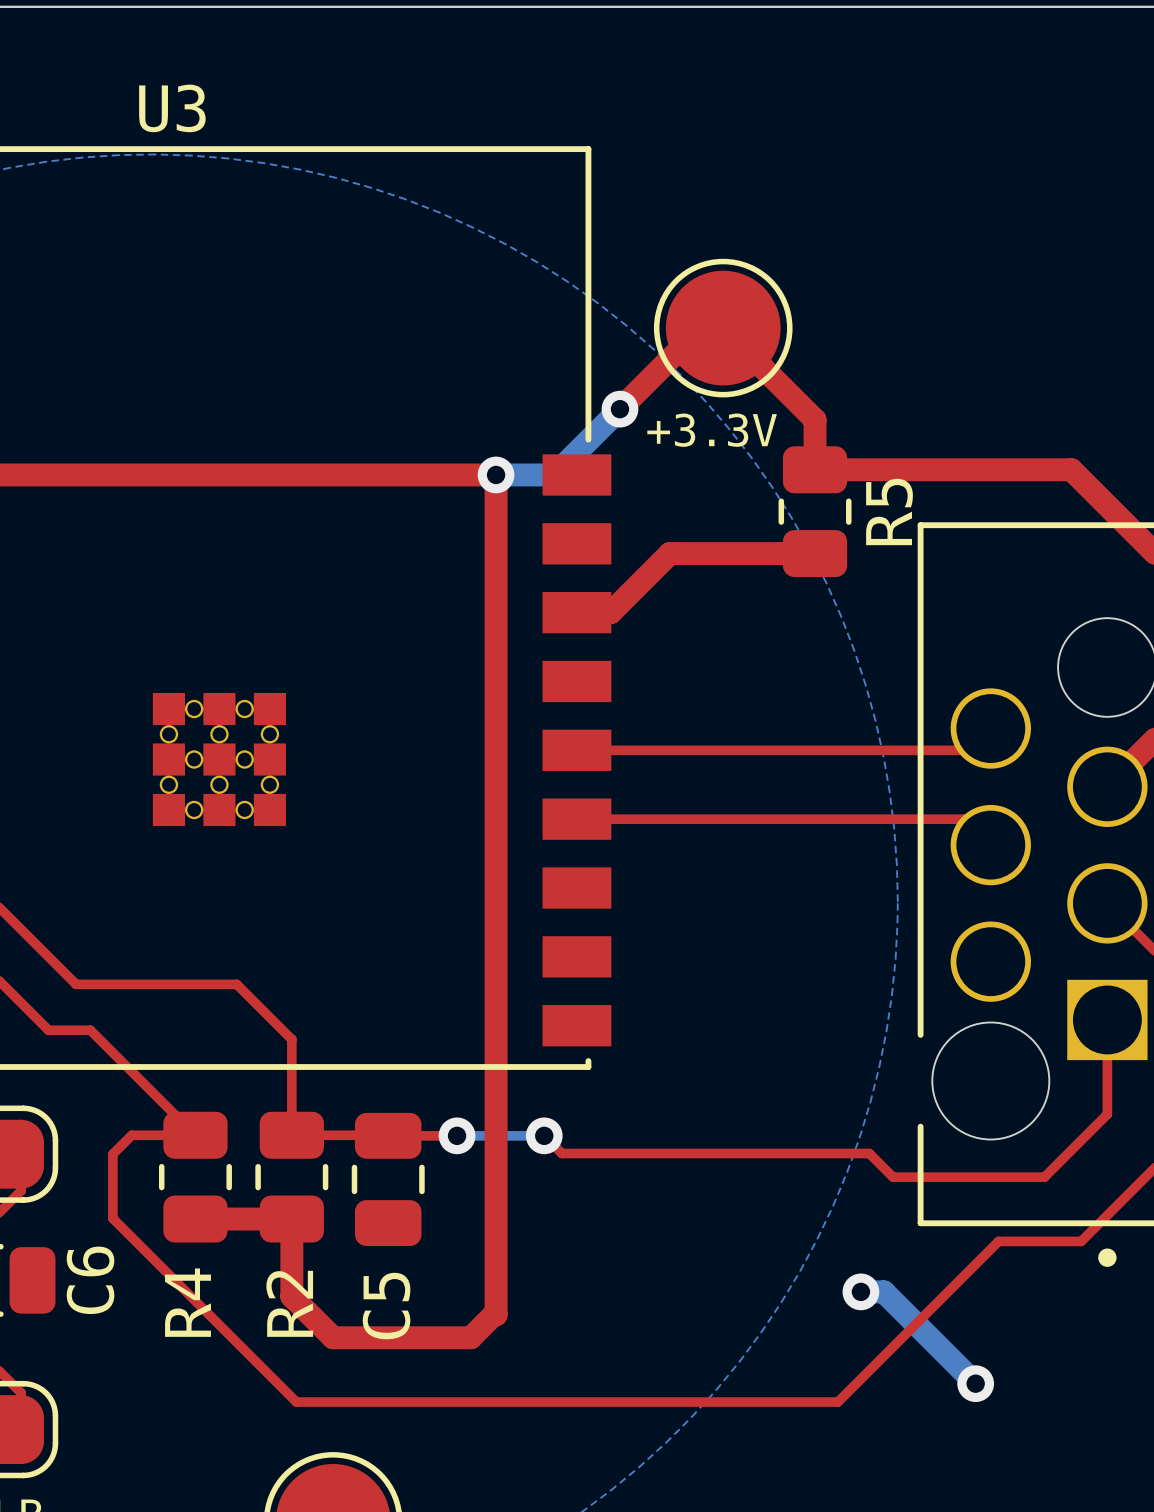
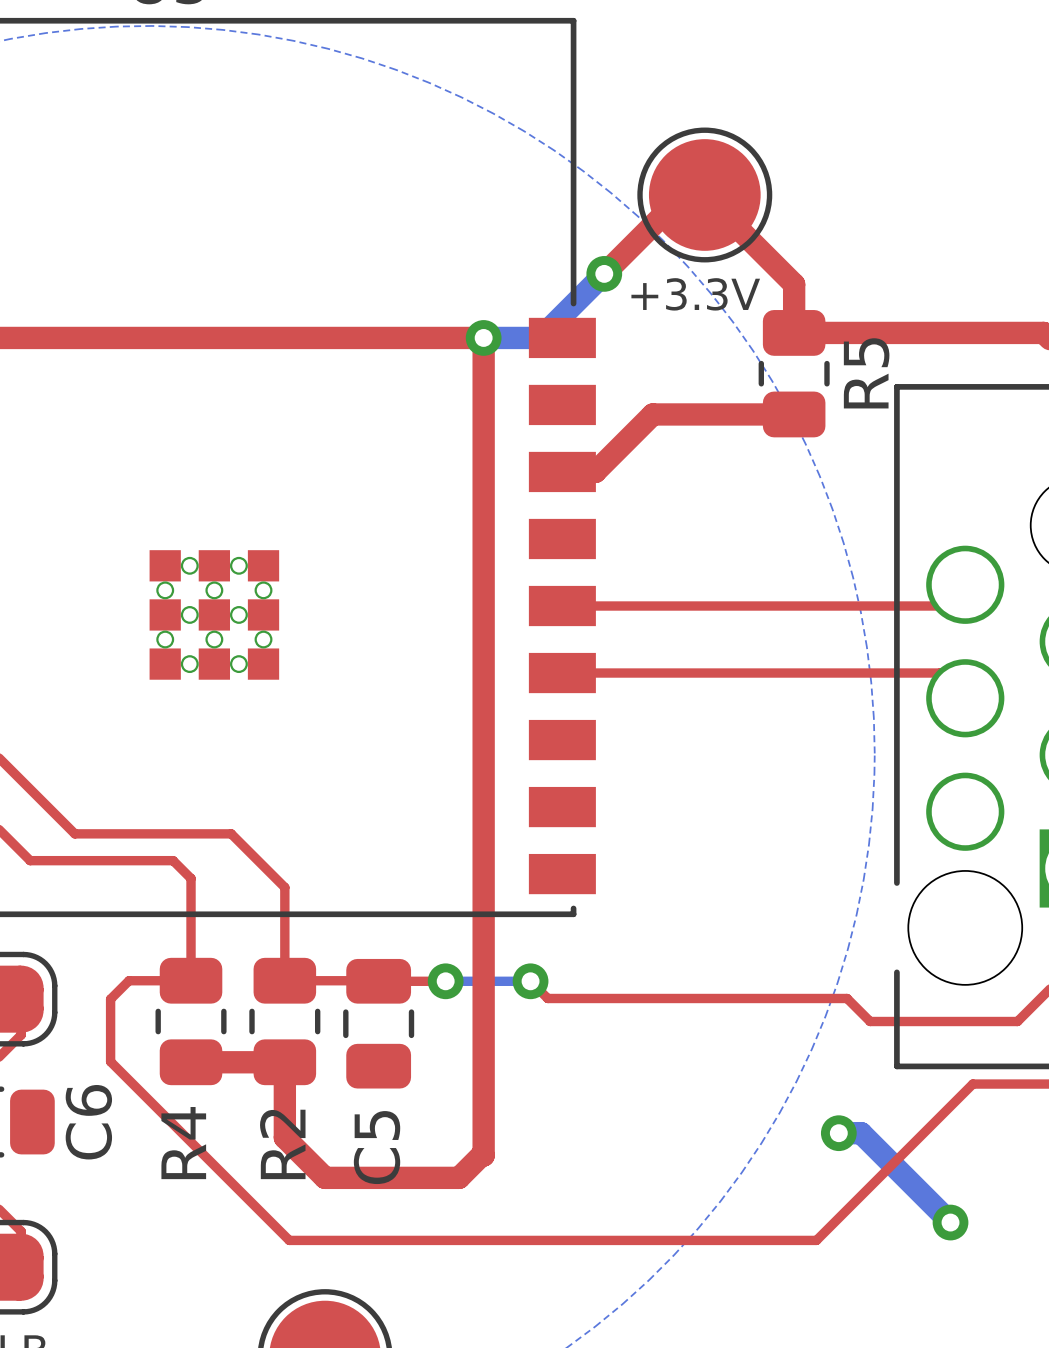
top track: (30, 1011) (48, 1030) (90, 1030) (195, 1135) -> (30, 860) (173, 860) (191, 878) (191, 980)

